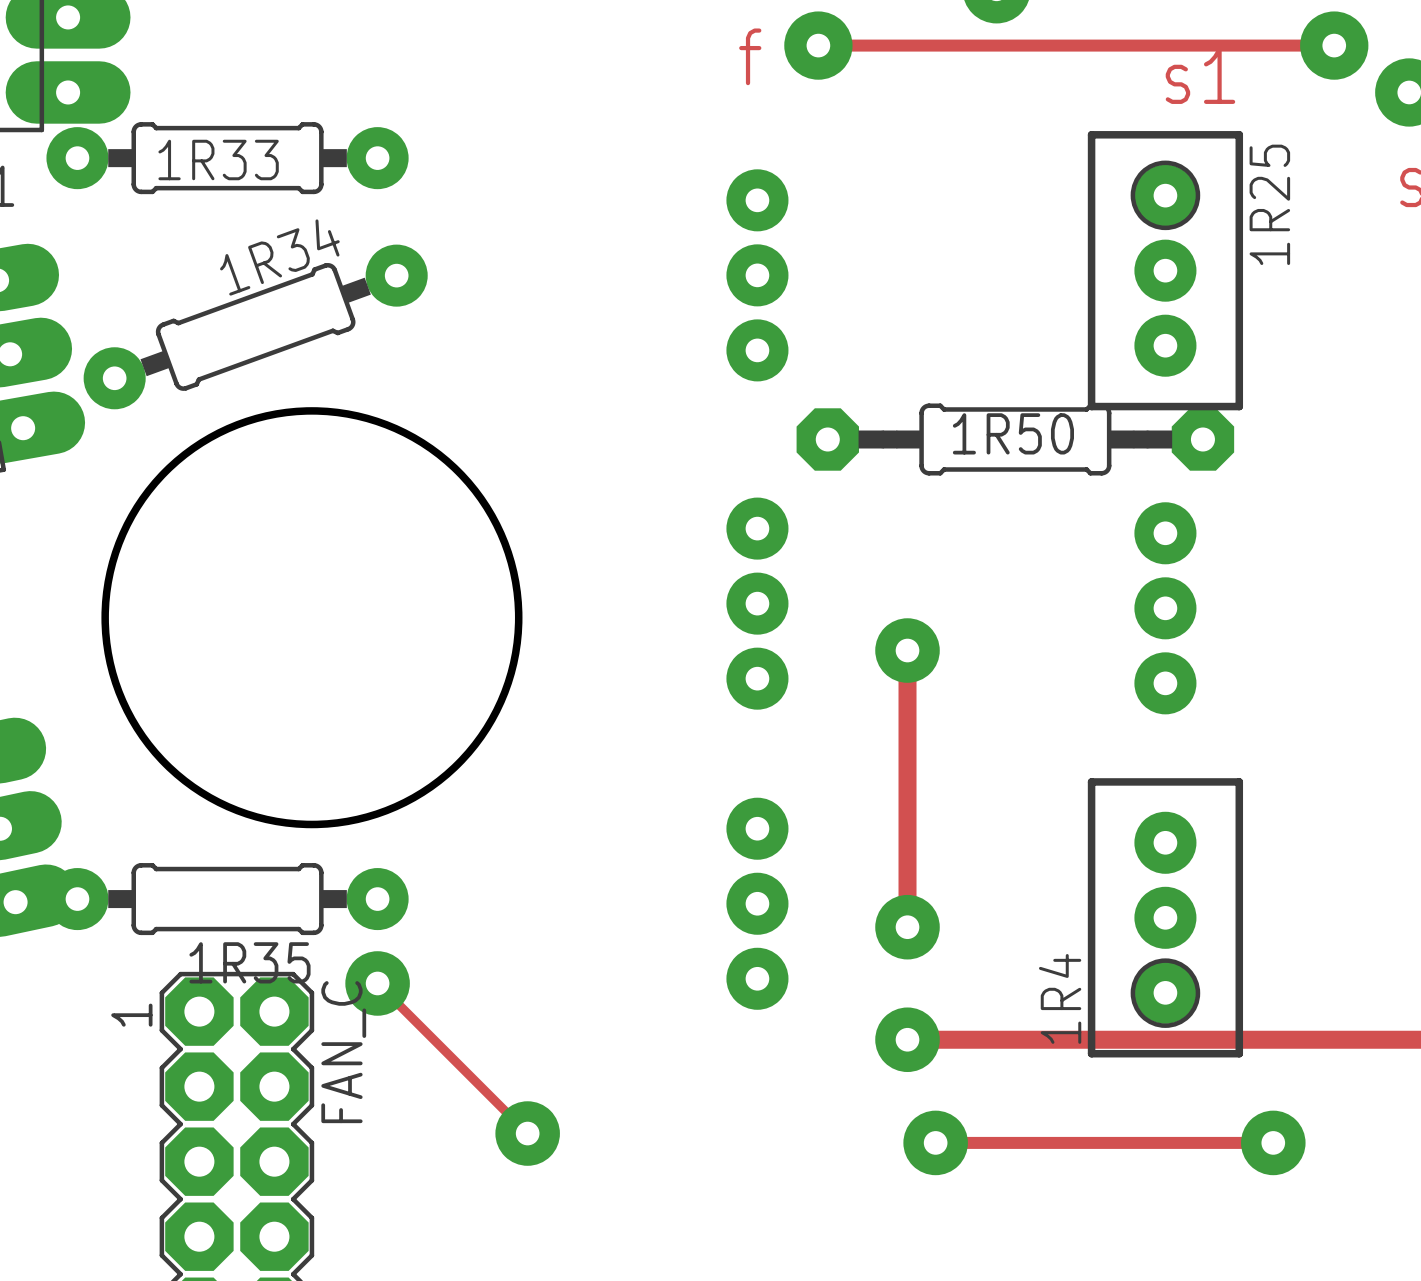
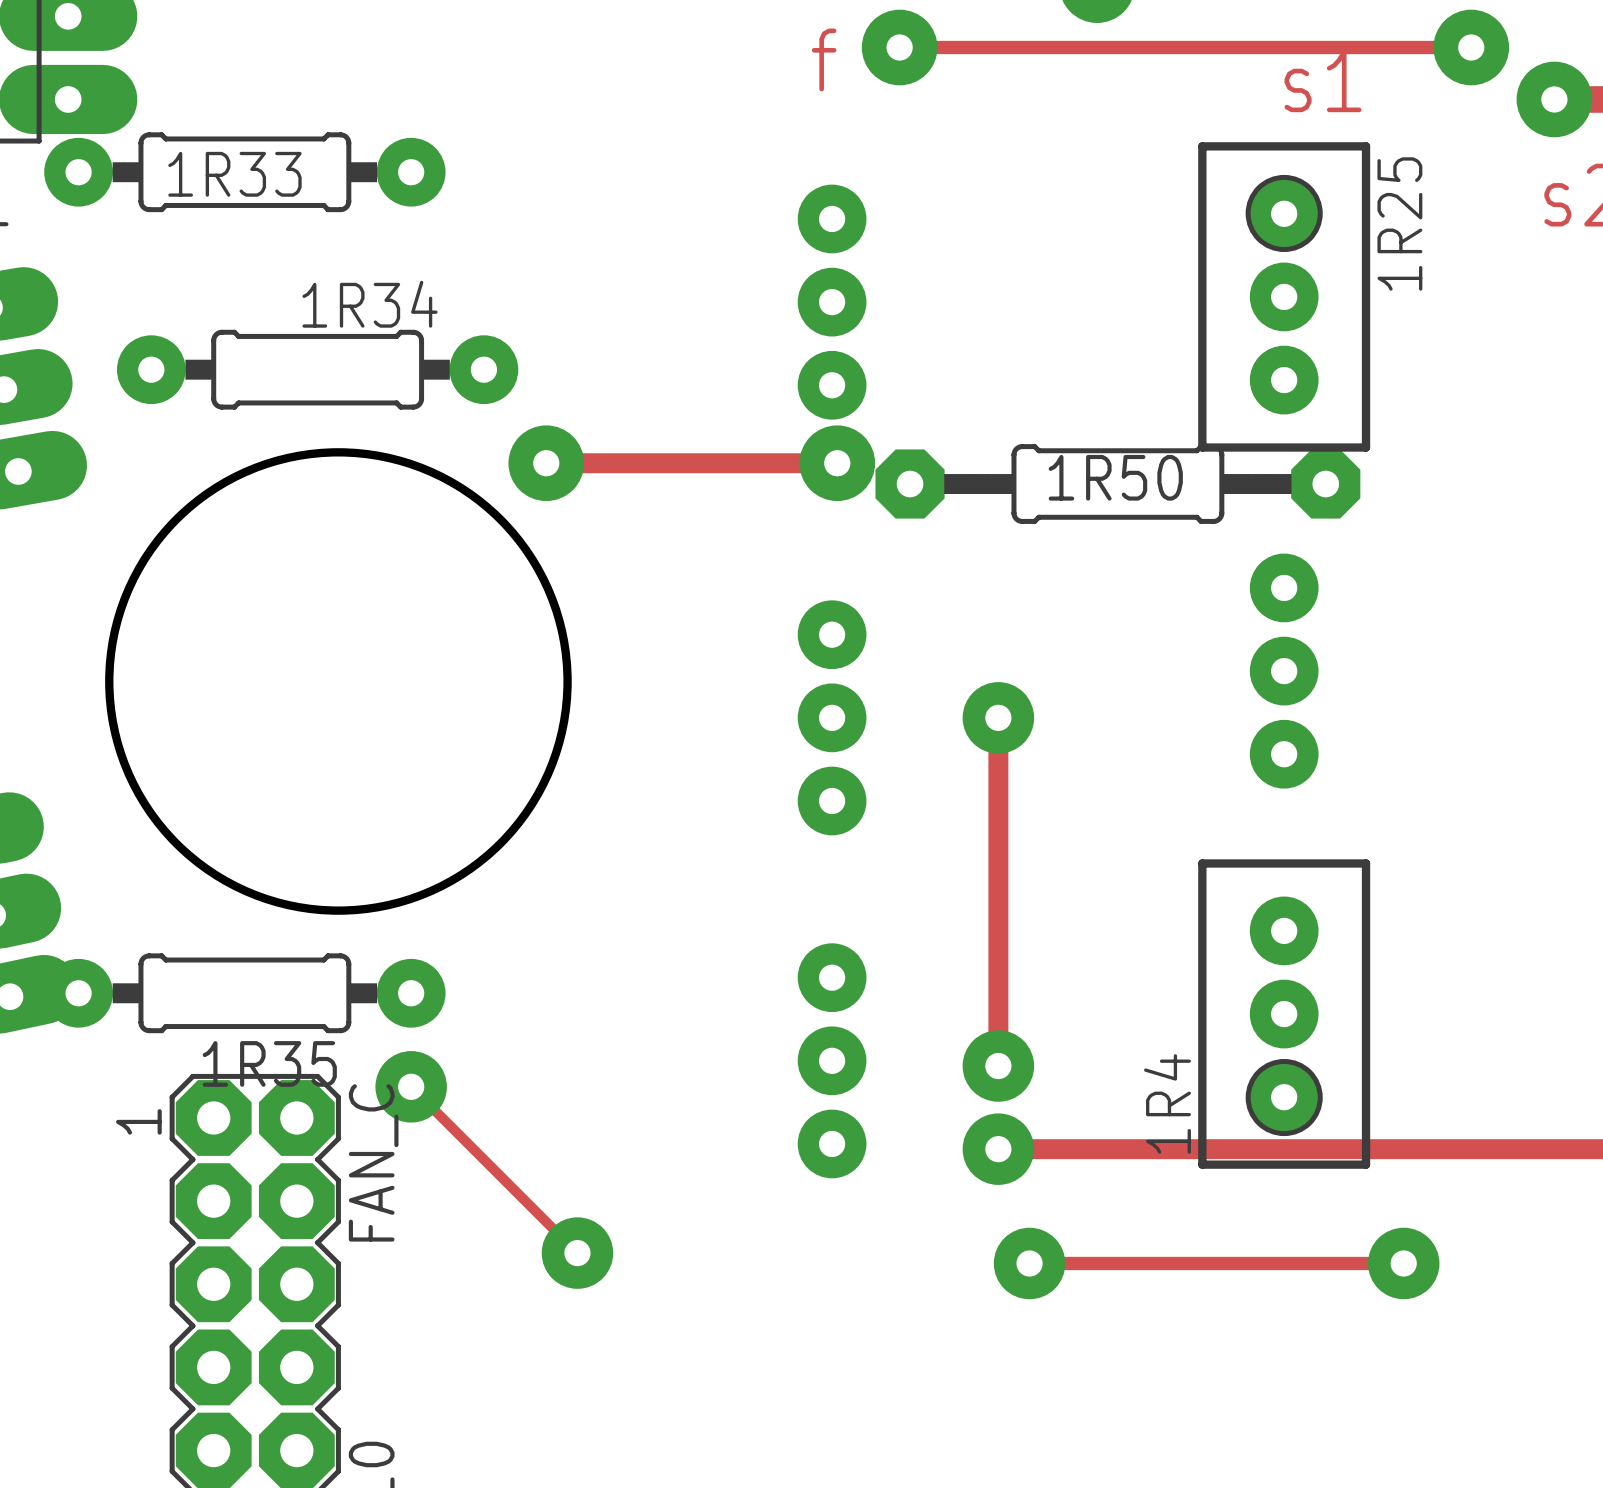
1R34 rotation: 0° (255, 326) -> 20° clockwise (317, 369)
track: none -> (546, 463) (837, 463)
via: none -> (546, 463)
via: none -> (837, 463)
part position: (757, 603) -> (832, 717)
part position: (757, 903) -> (832, 1060)
via position: (907, 927) -> (998, 1066)

